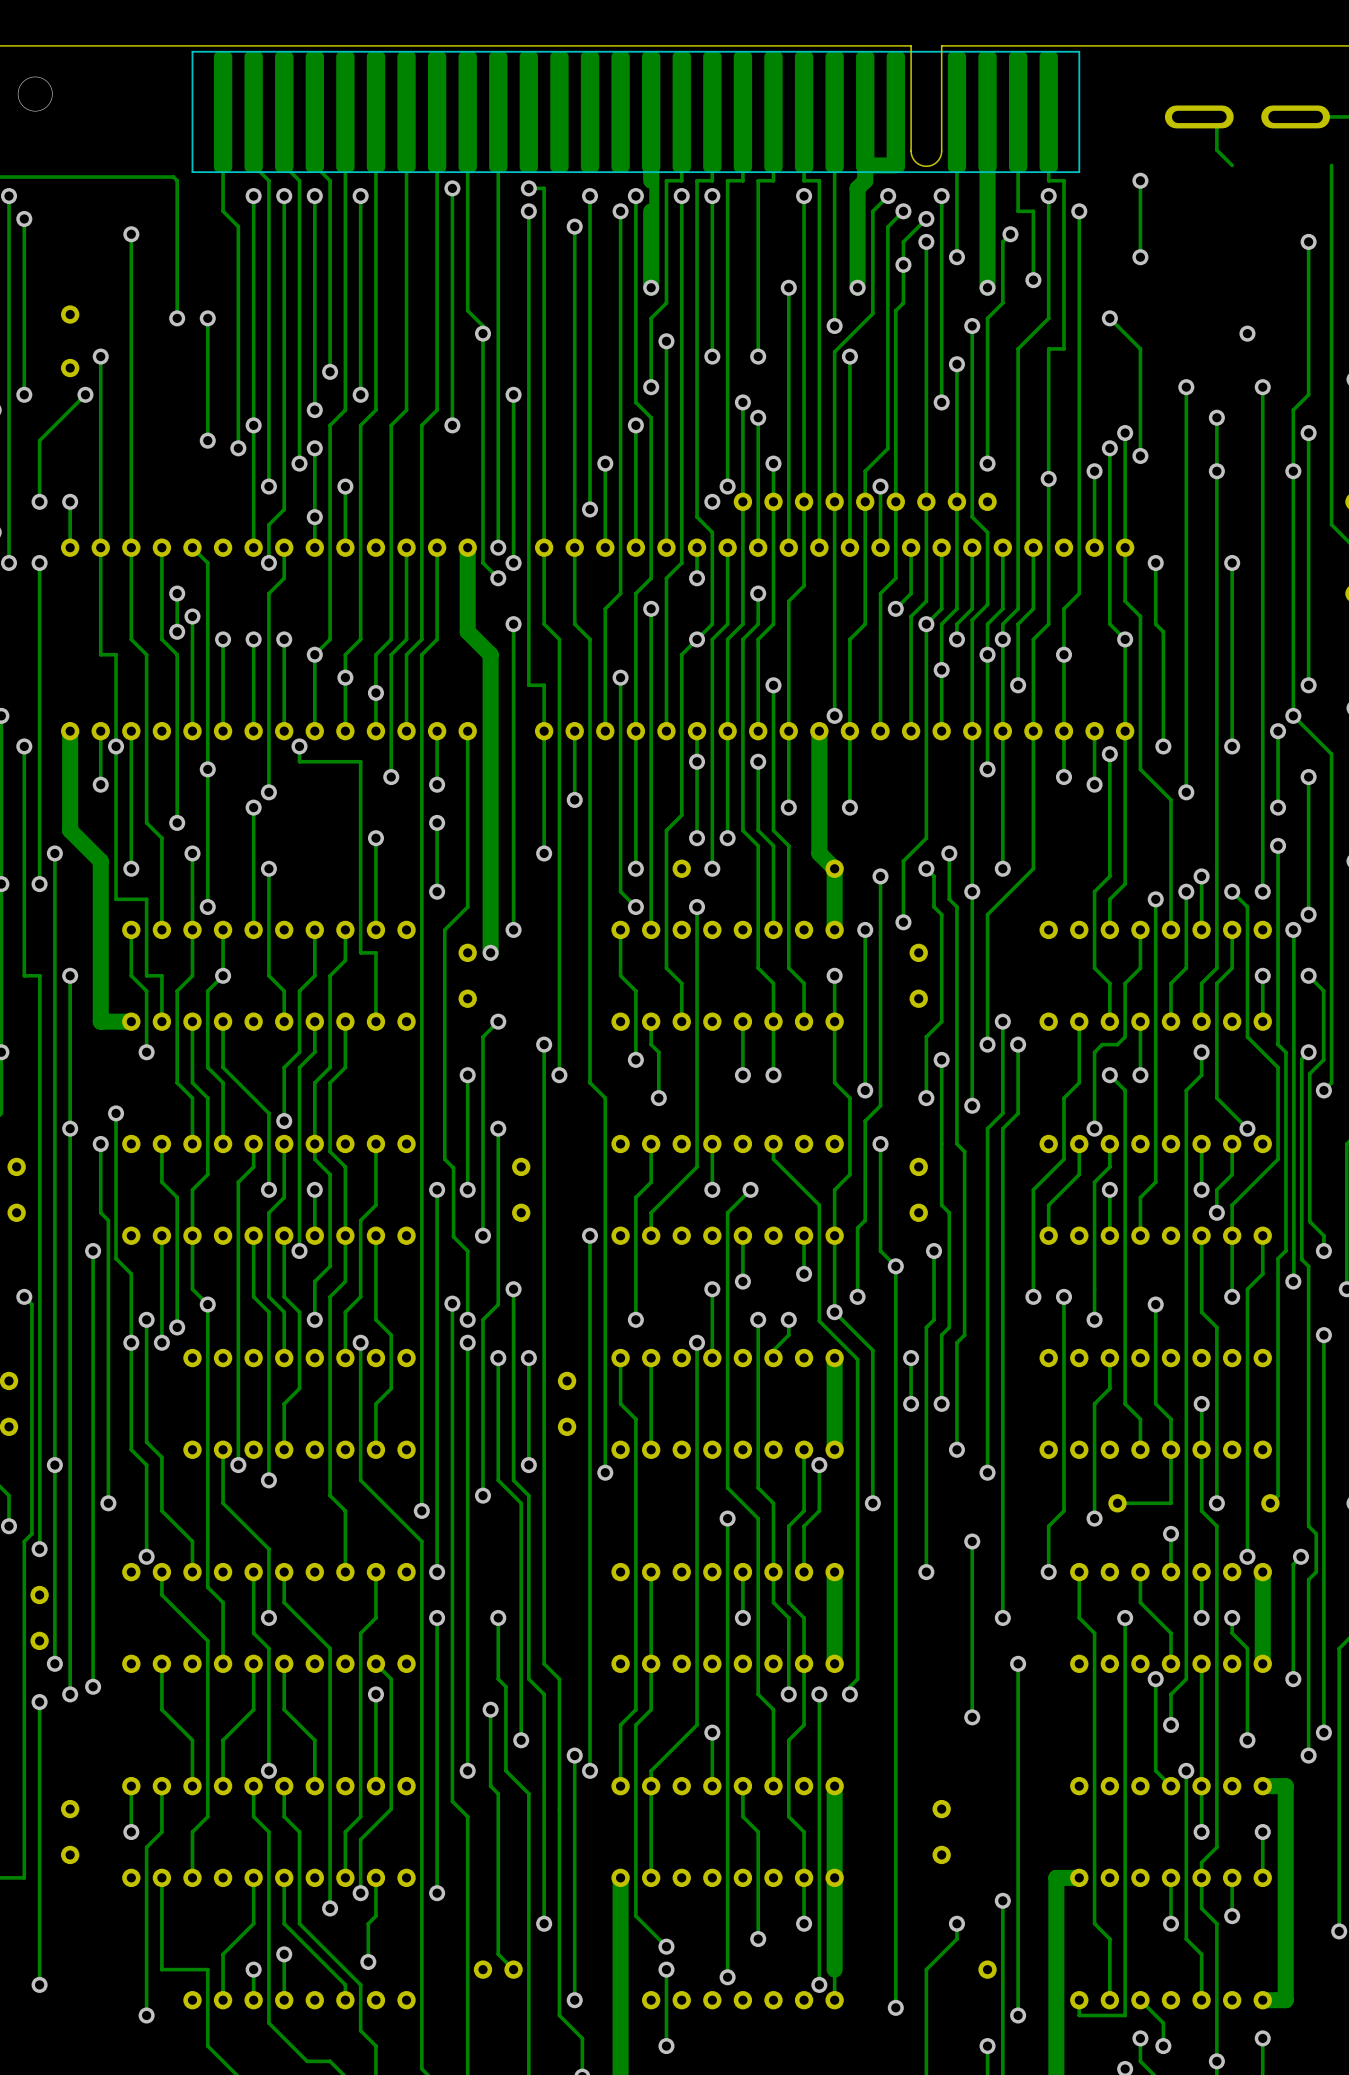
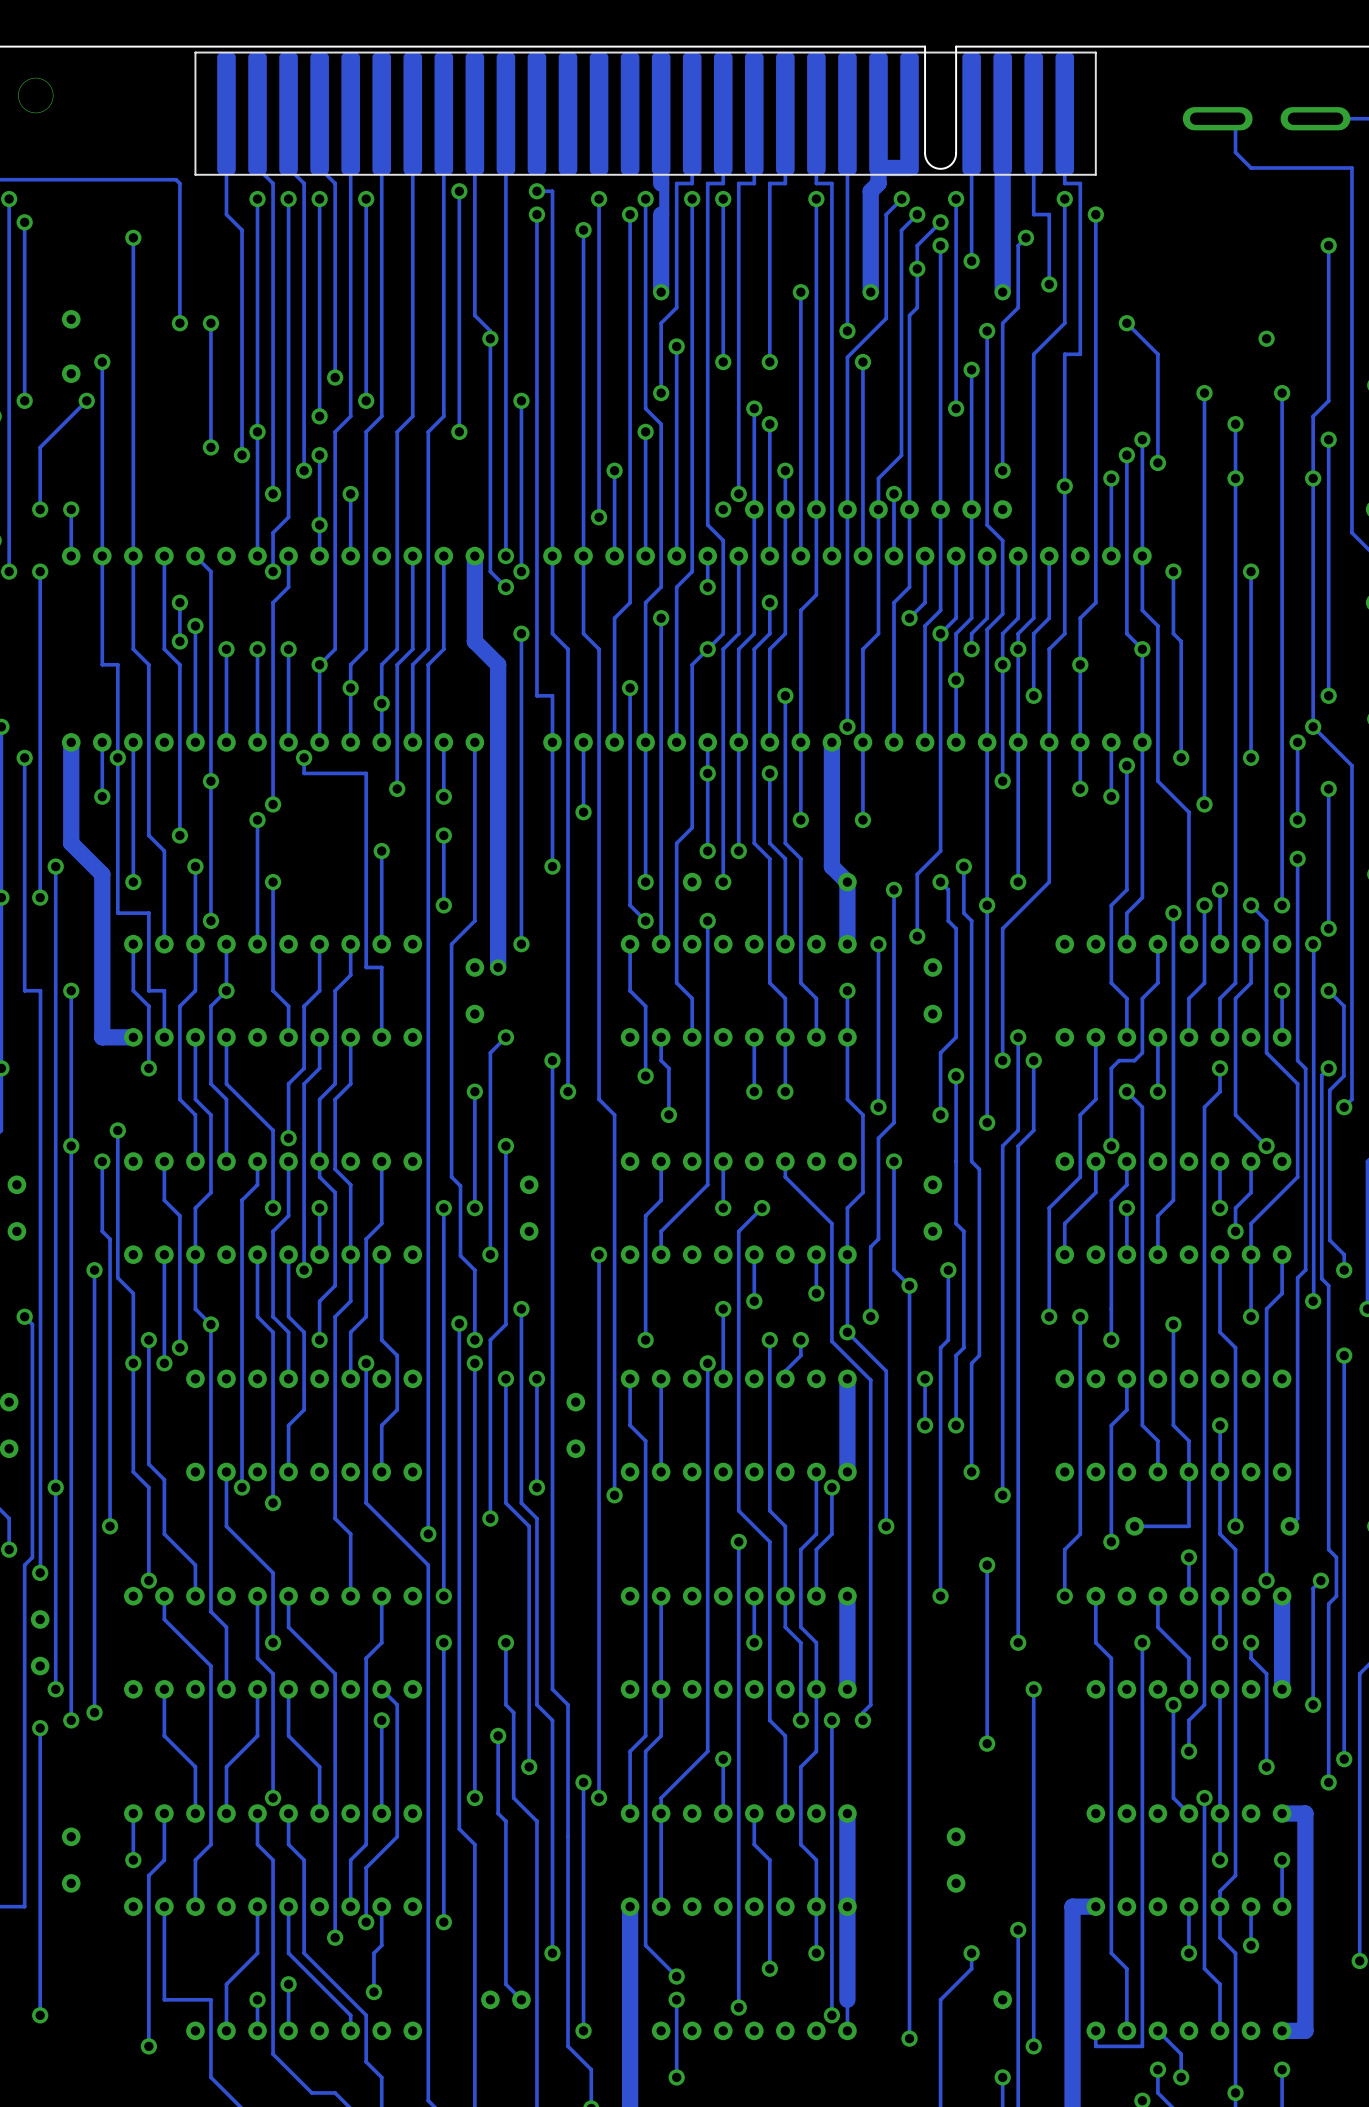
track: none -> (1351, 167) (1251, 167)
track: (1140, 180) (1140, 257) -> none
via: (1140, 180) -> none
via: (1140, 257) -> none

